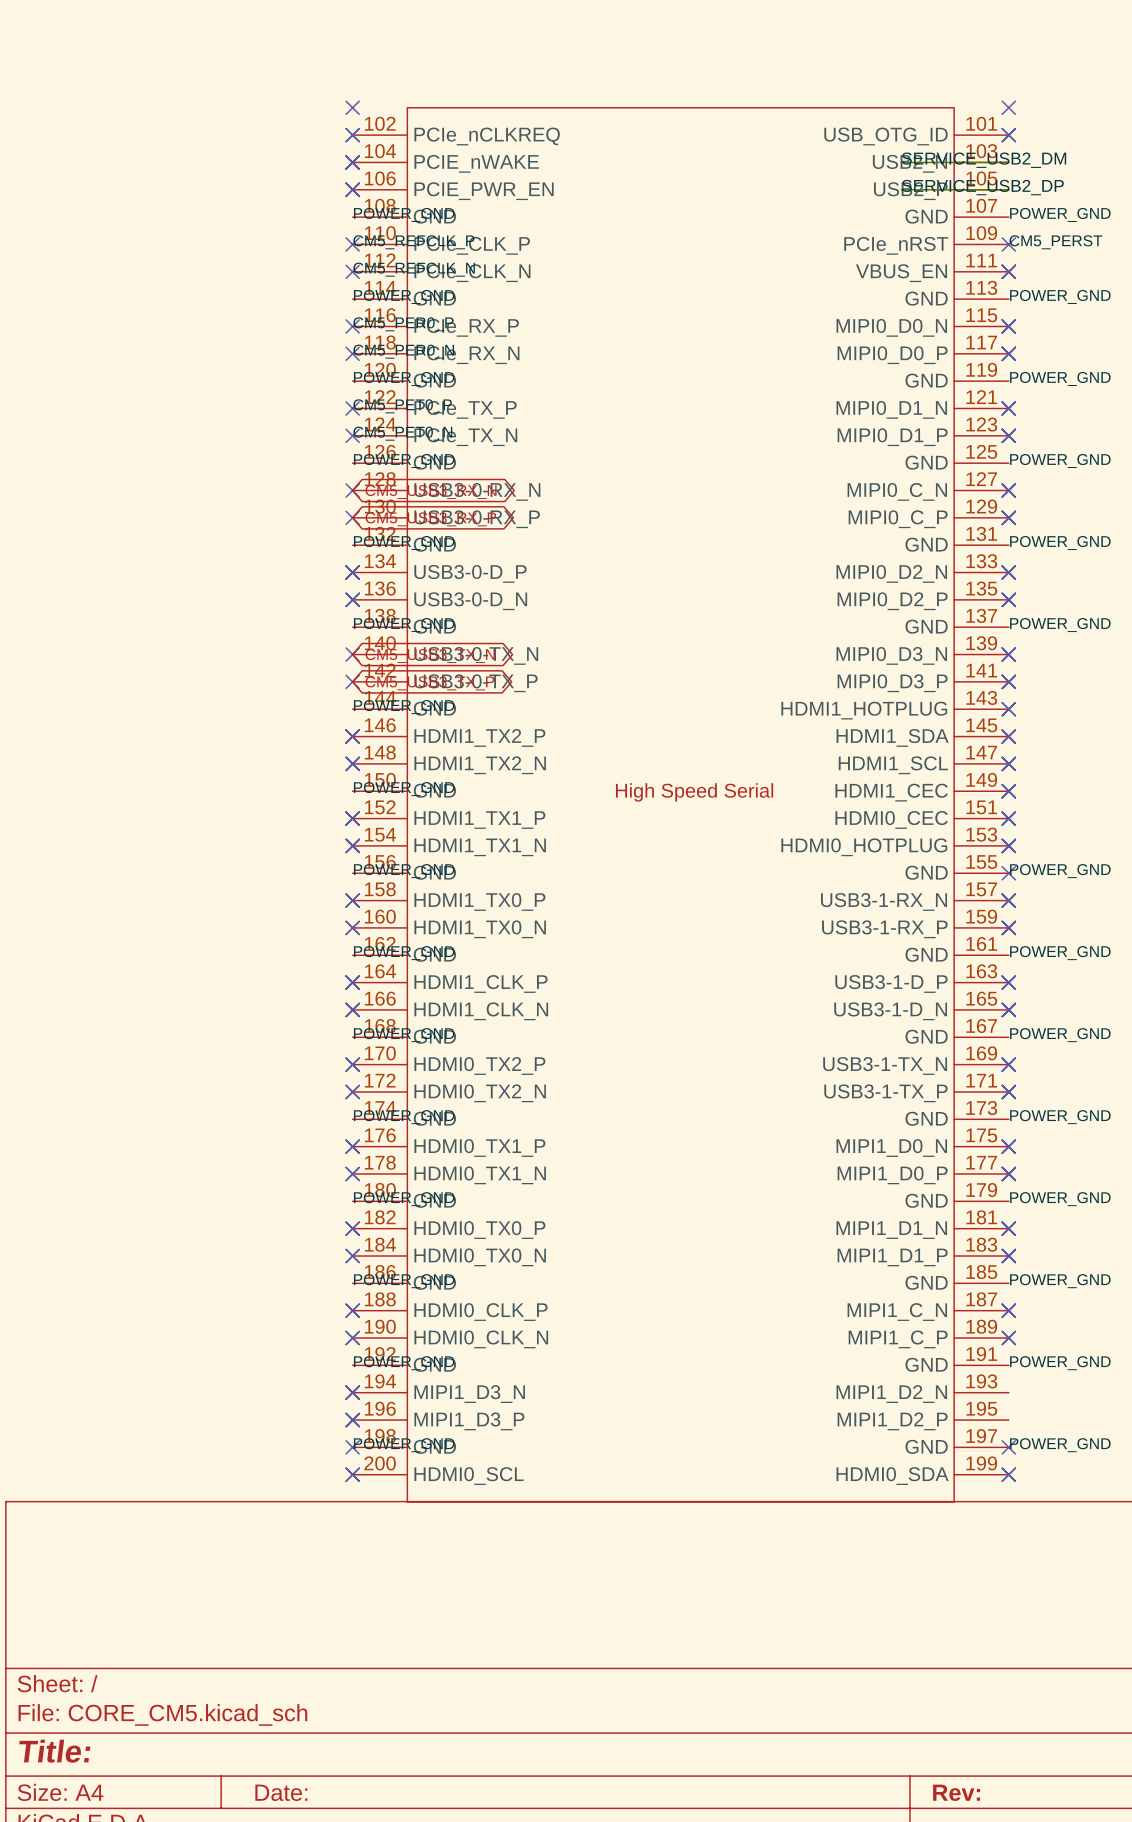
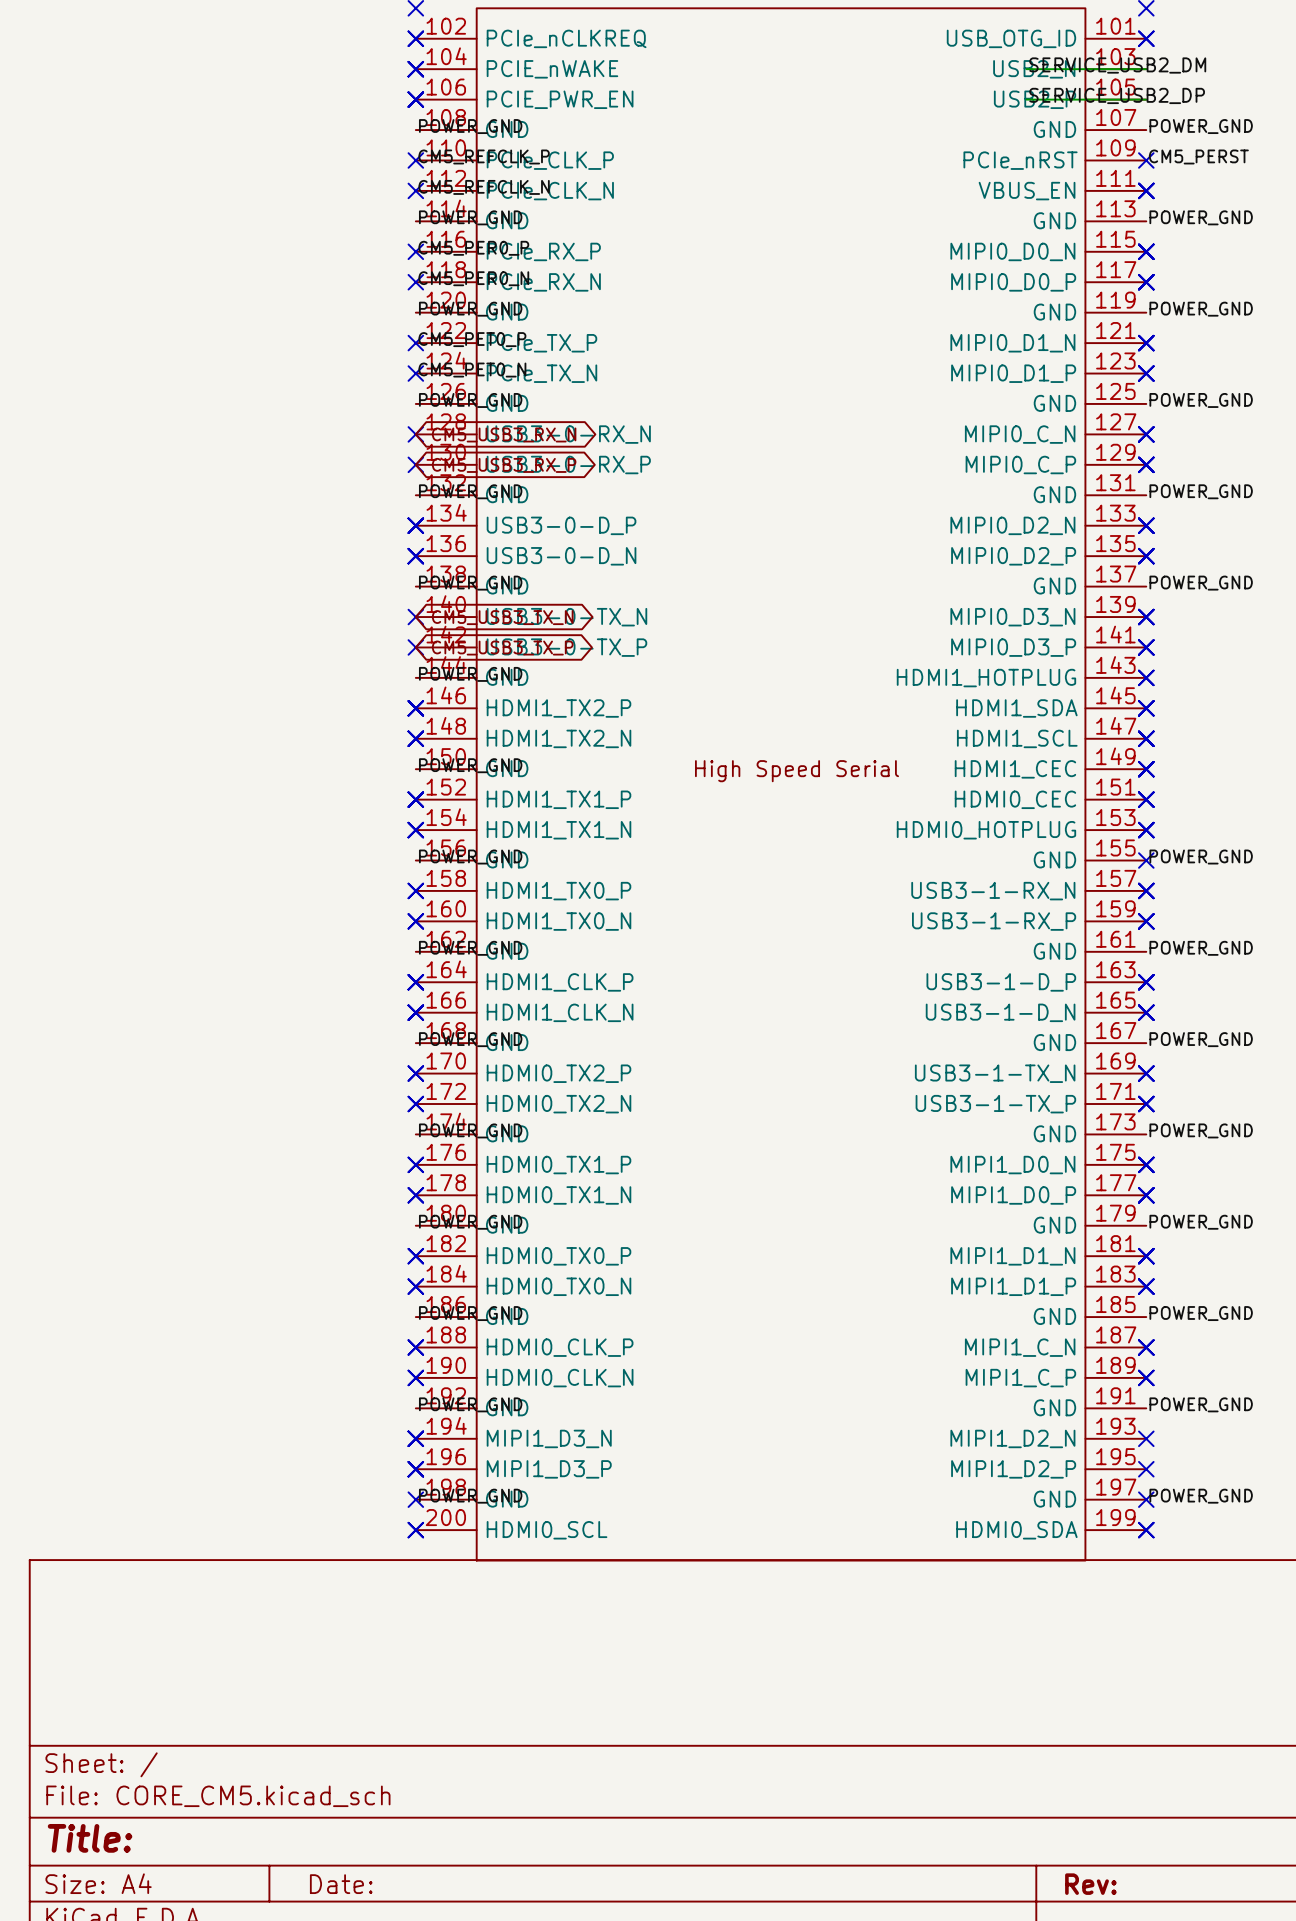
no-connect mark: none -> (1146, 1438)
no-connect mark: none -> (1146, 1469)

